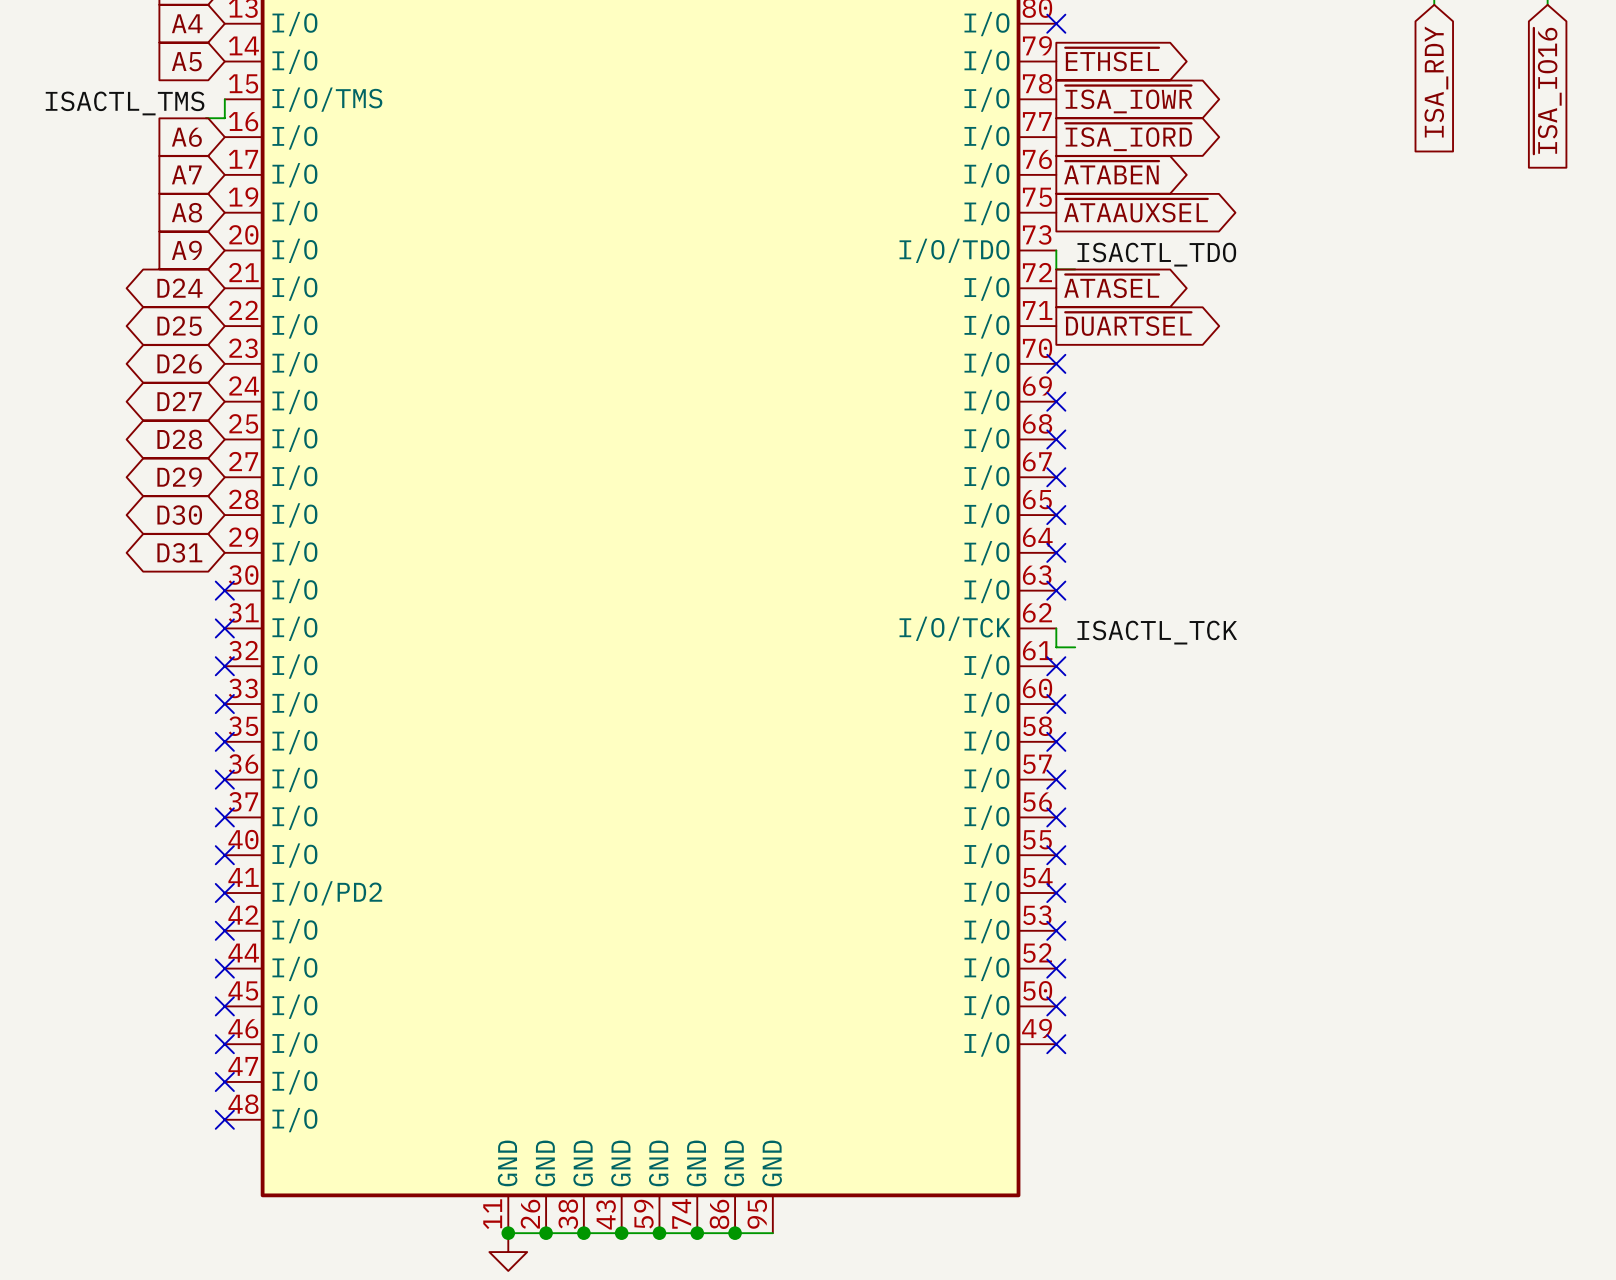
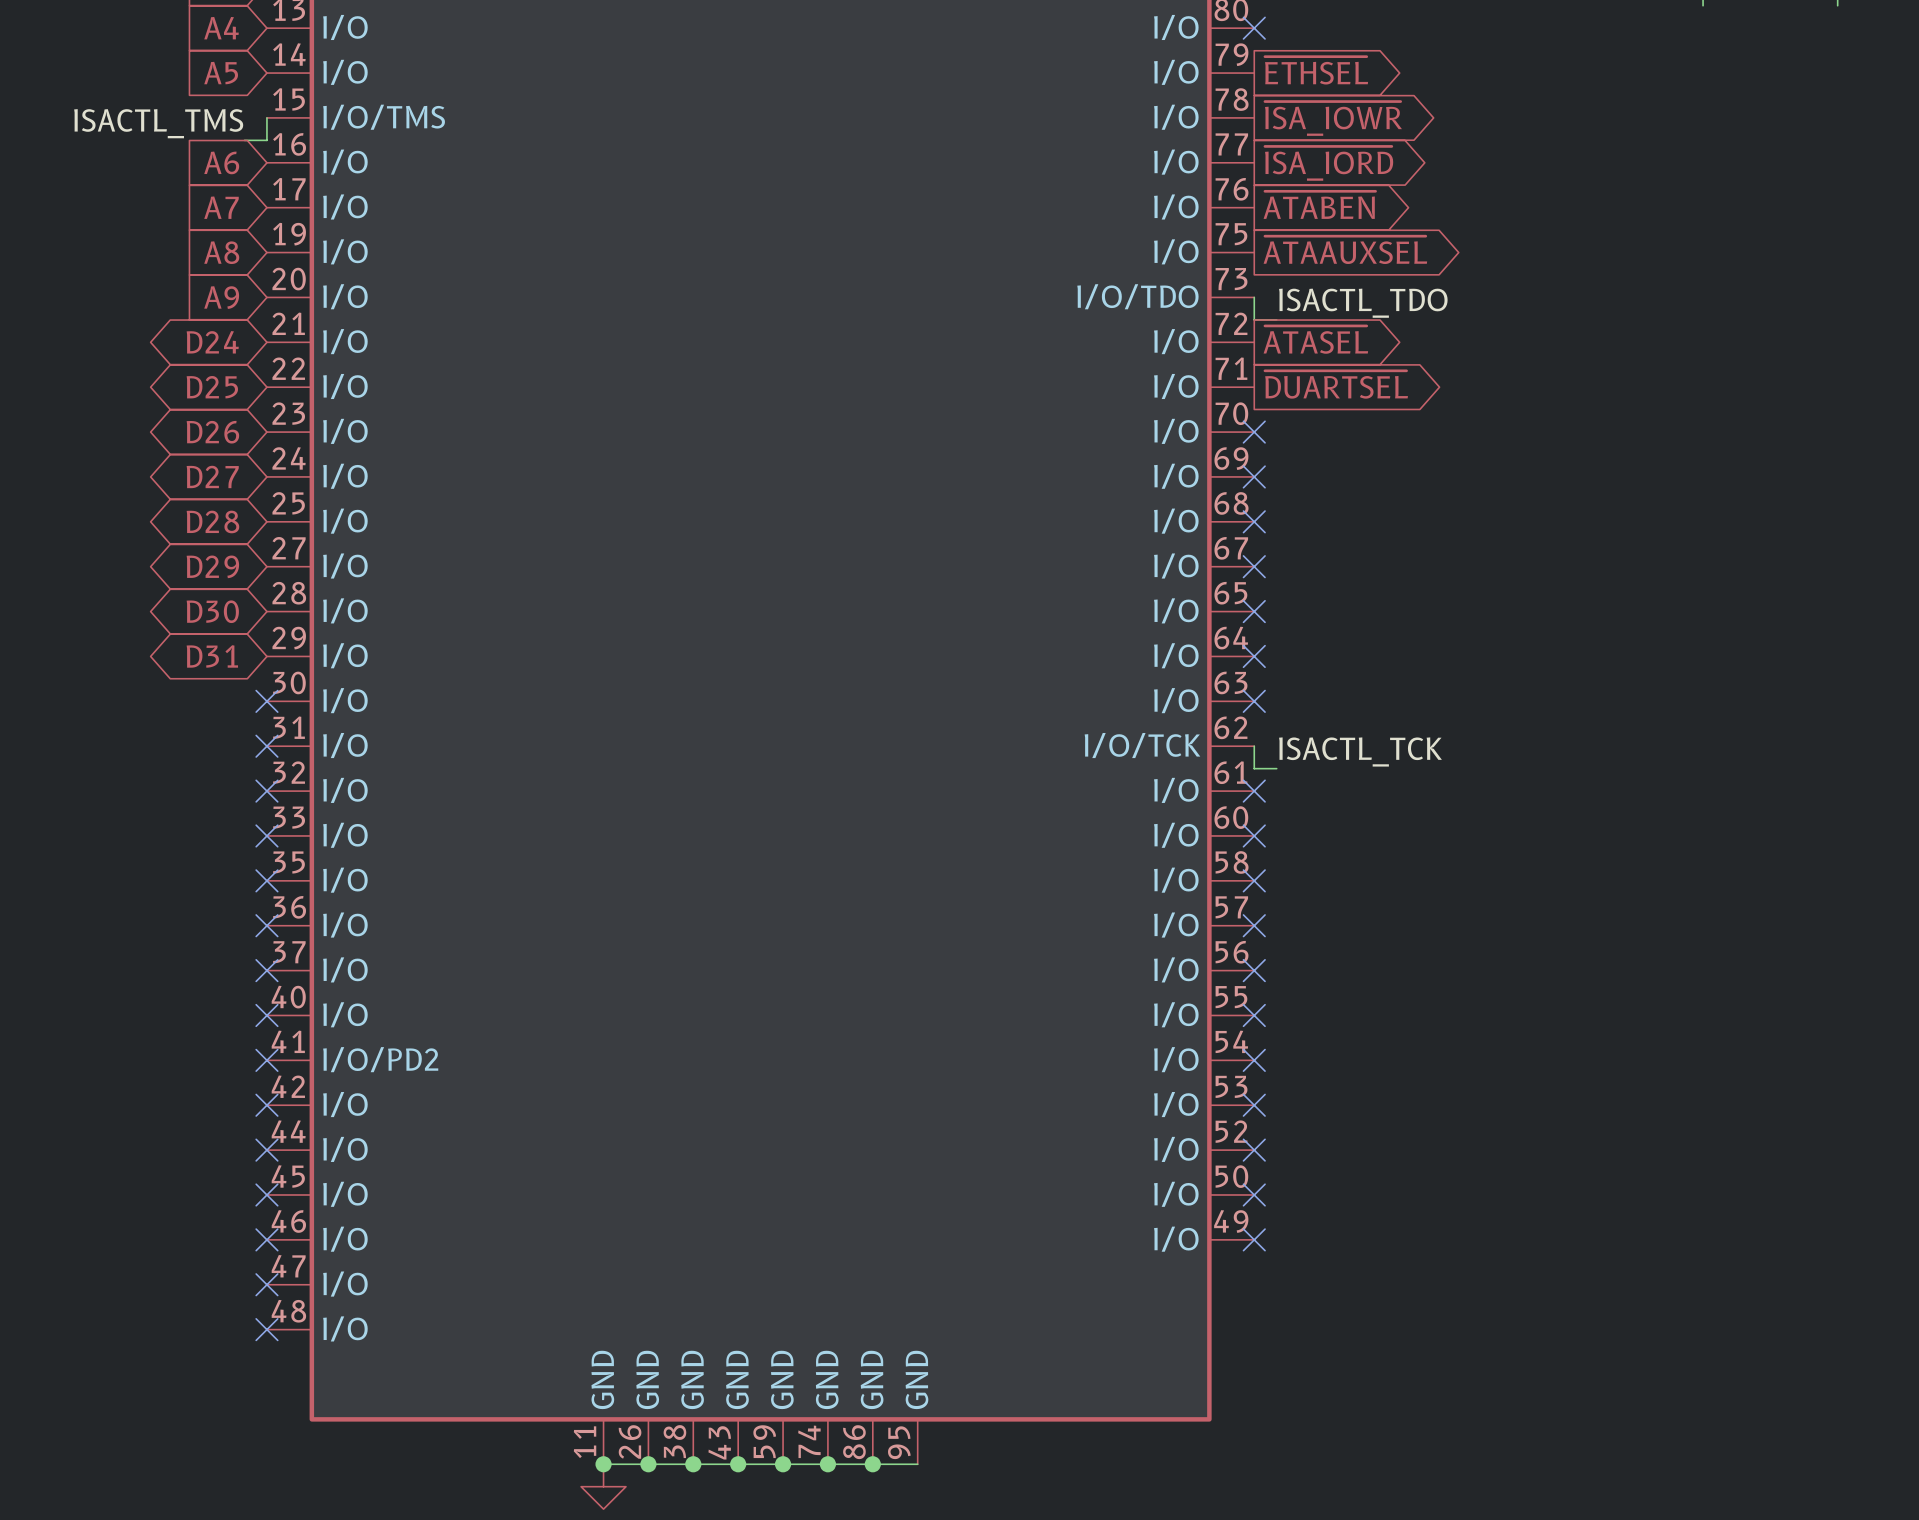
global label: ISA_RDY (1436, 82) -> none
global label: ~{ISA_IO16} (1547, 90) -> none

